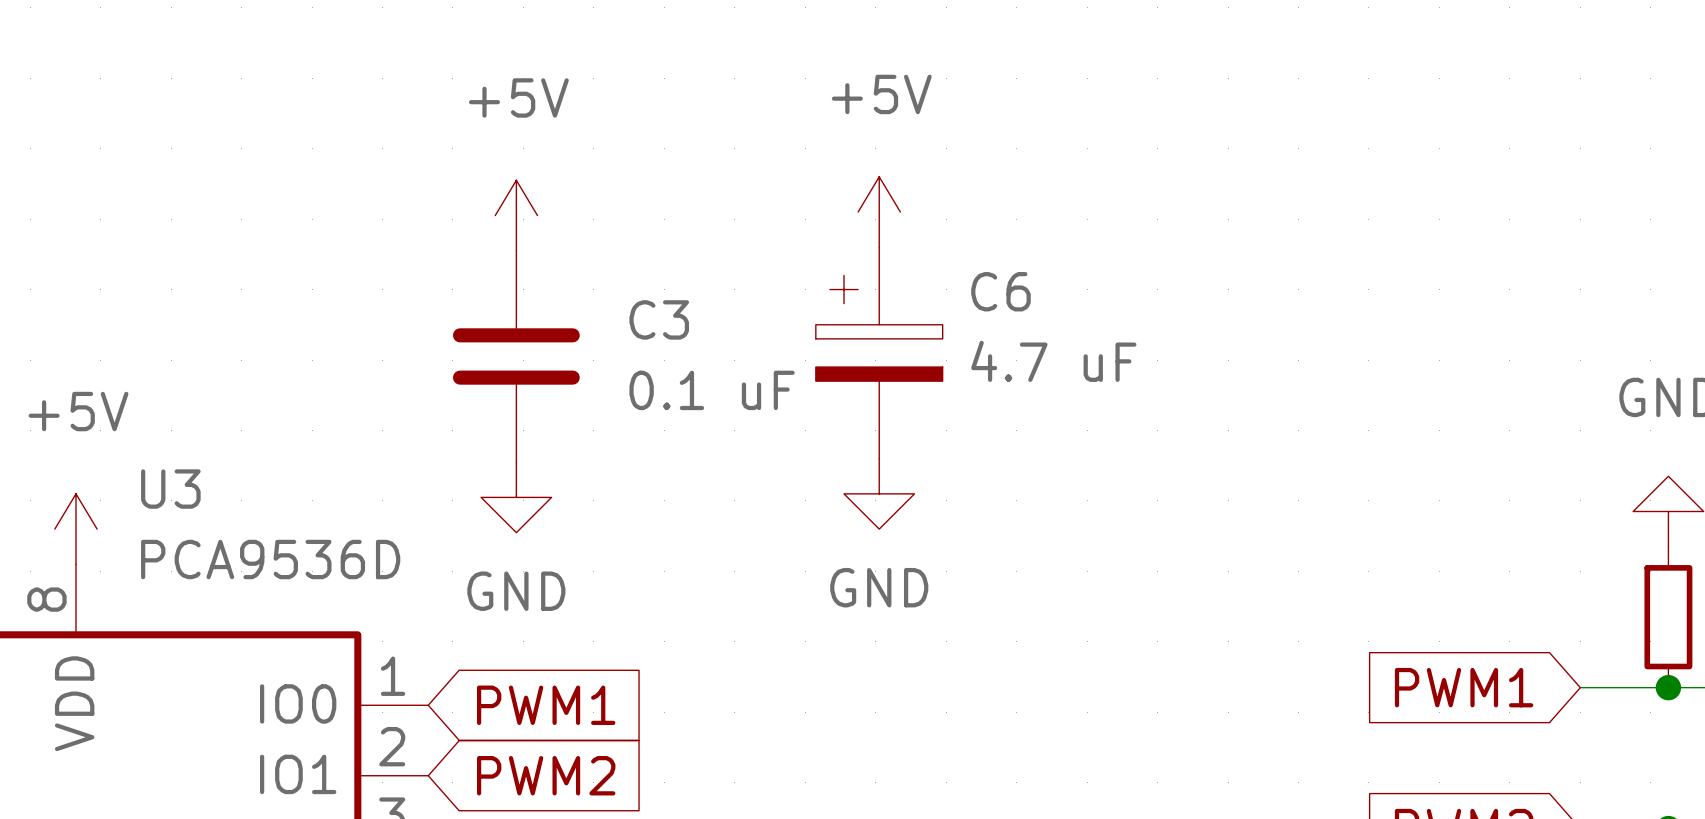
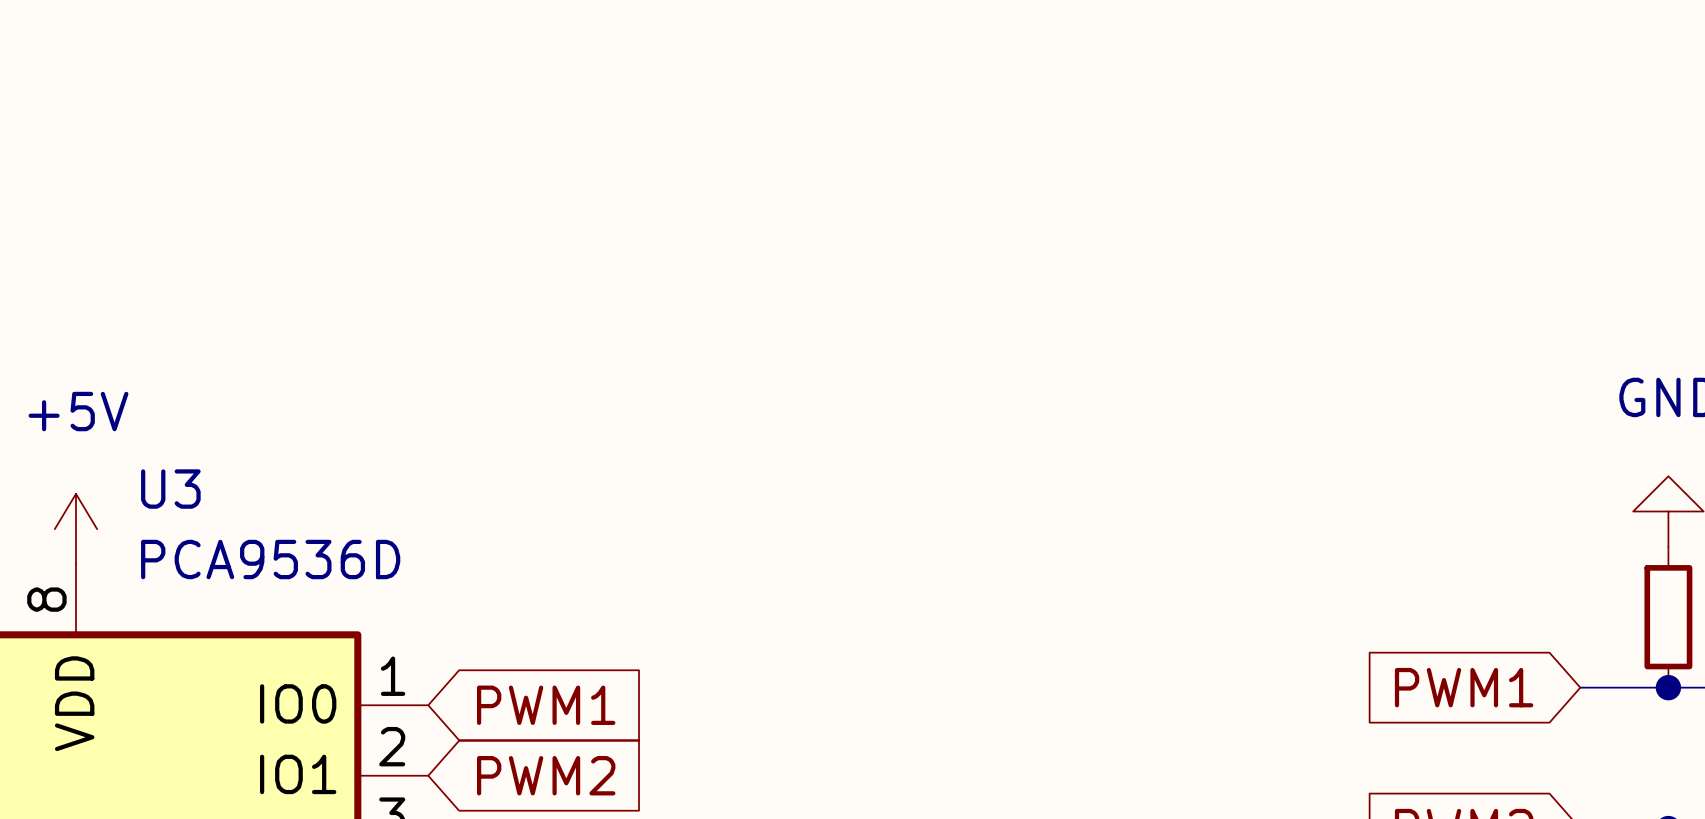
power symbol: +5V (879, 212) -> none
power symbol: +5V (516, 215) -> none
C6: 4.7 uF (879, 352) -> none
C3: 0.1 uF (516, 356) -> none
power symbol: GND (879, 493) -> none
power symbol: GND (516, 497) -> none

